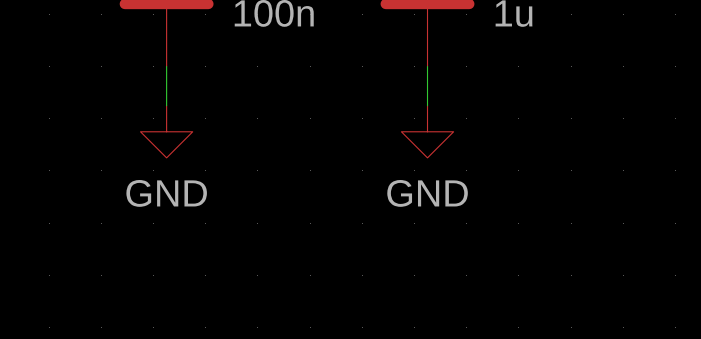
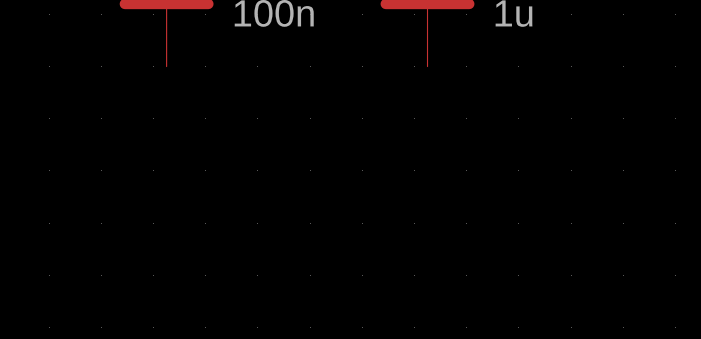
wire: (166, 66) (166, 105) -> none
wire: (427, 66) (427, 105) -> none
power symbol: GND (166, 131) -> none
power symbol: GND (427, 131) -> none

